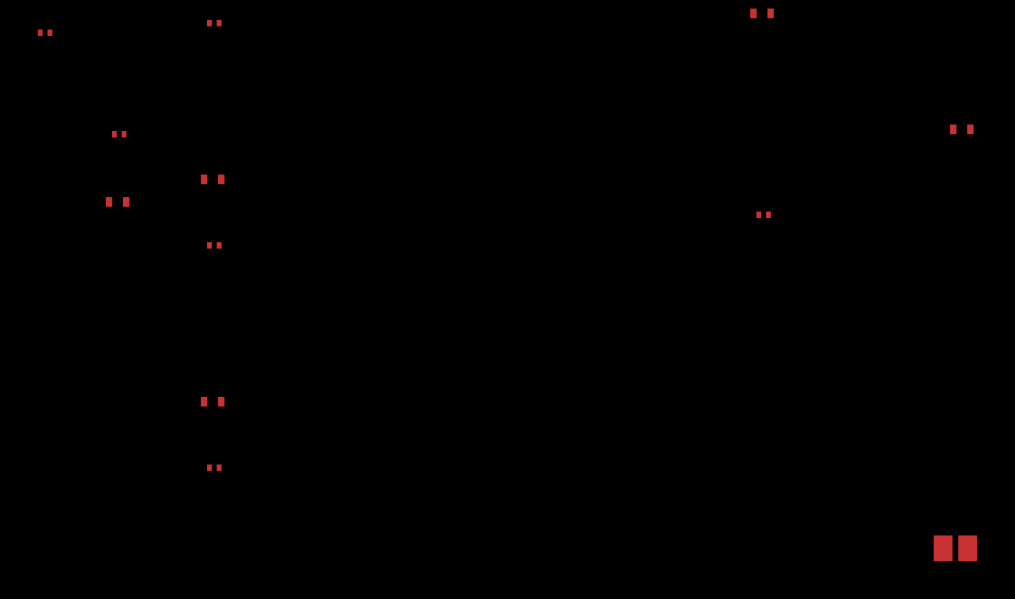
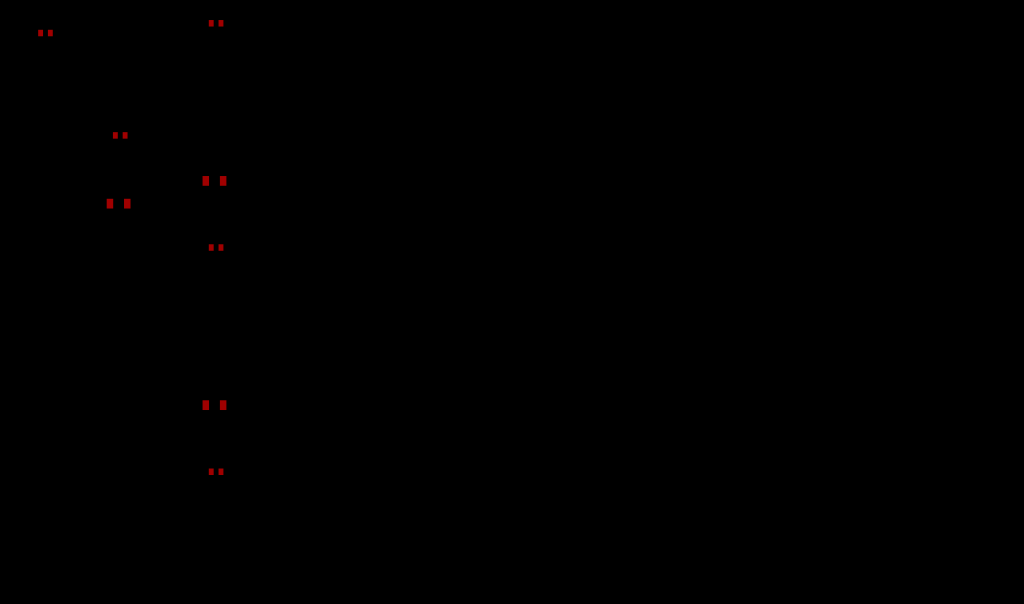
part: (762, 13) -> none
part: (961, 129) -> none
part: (763, 214) -> none
part: (955, 548) -> none

